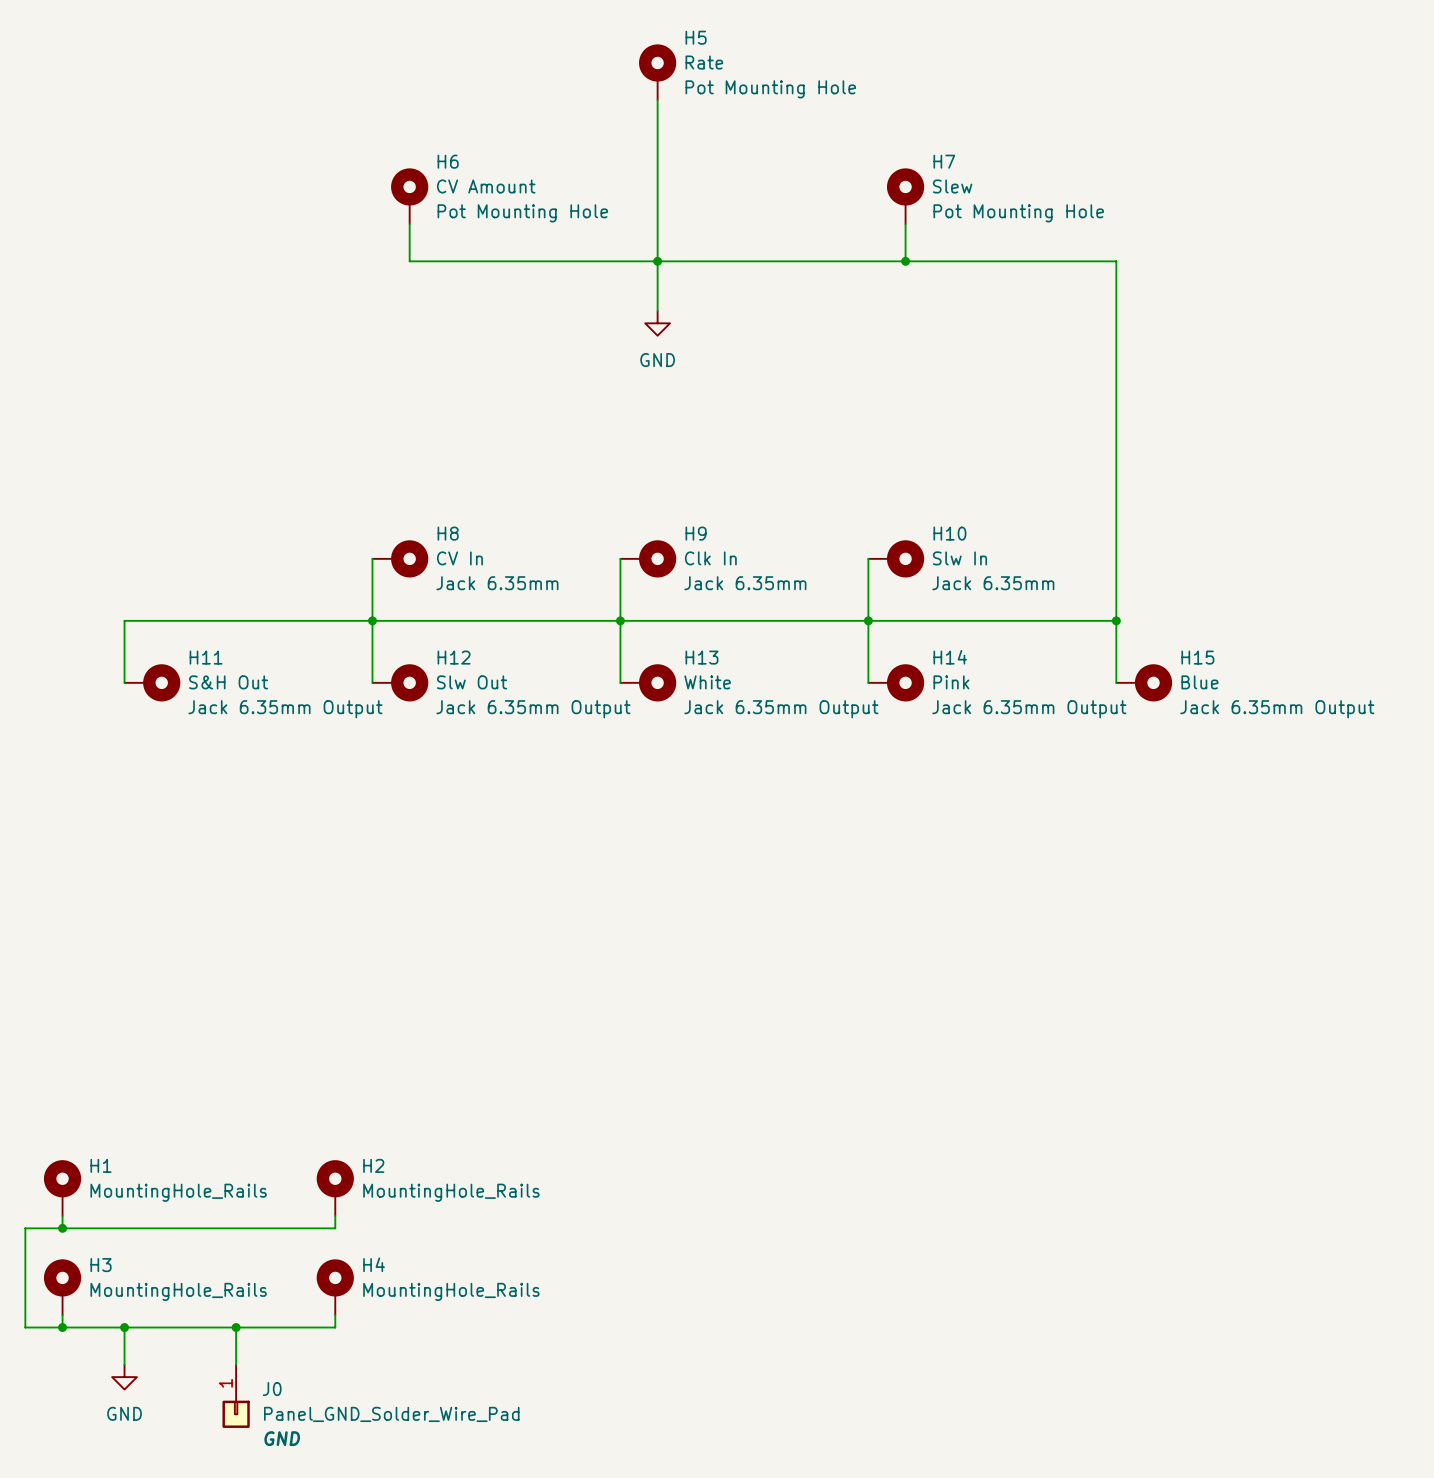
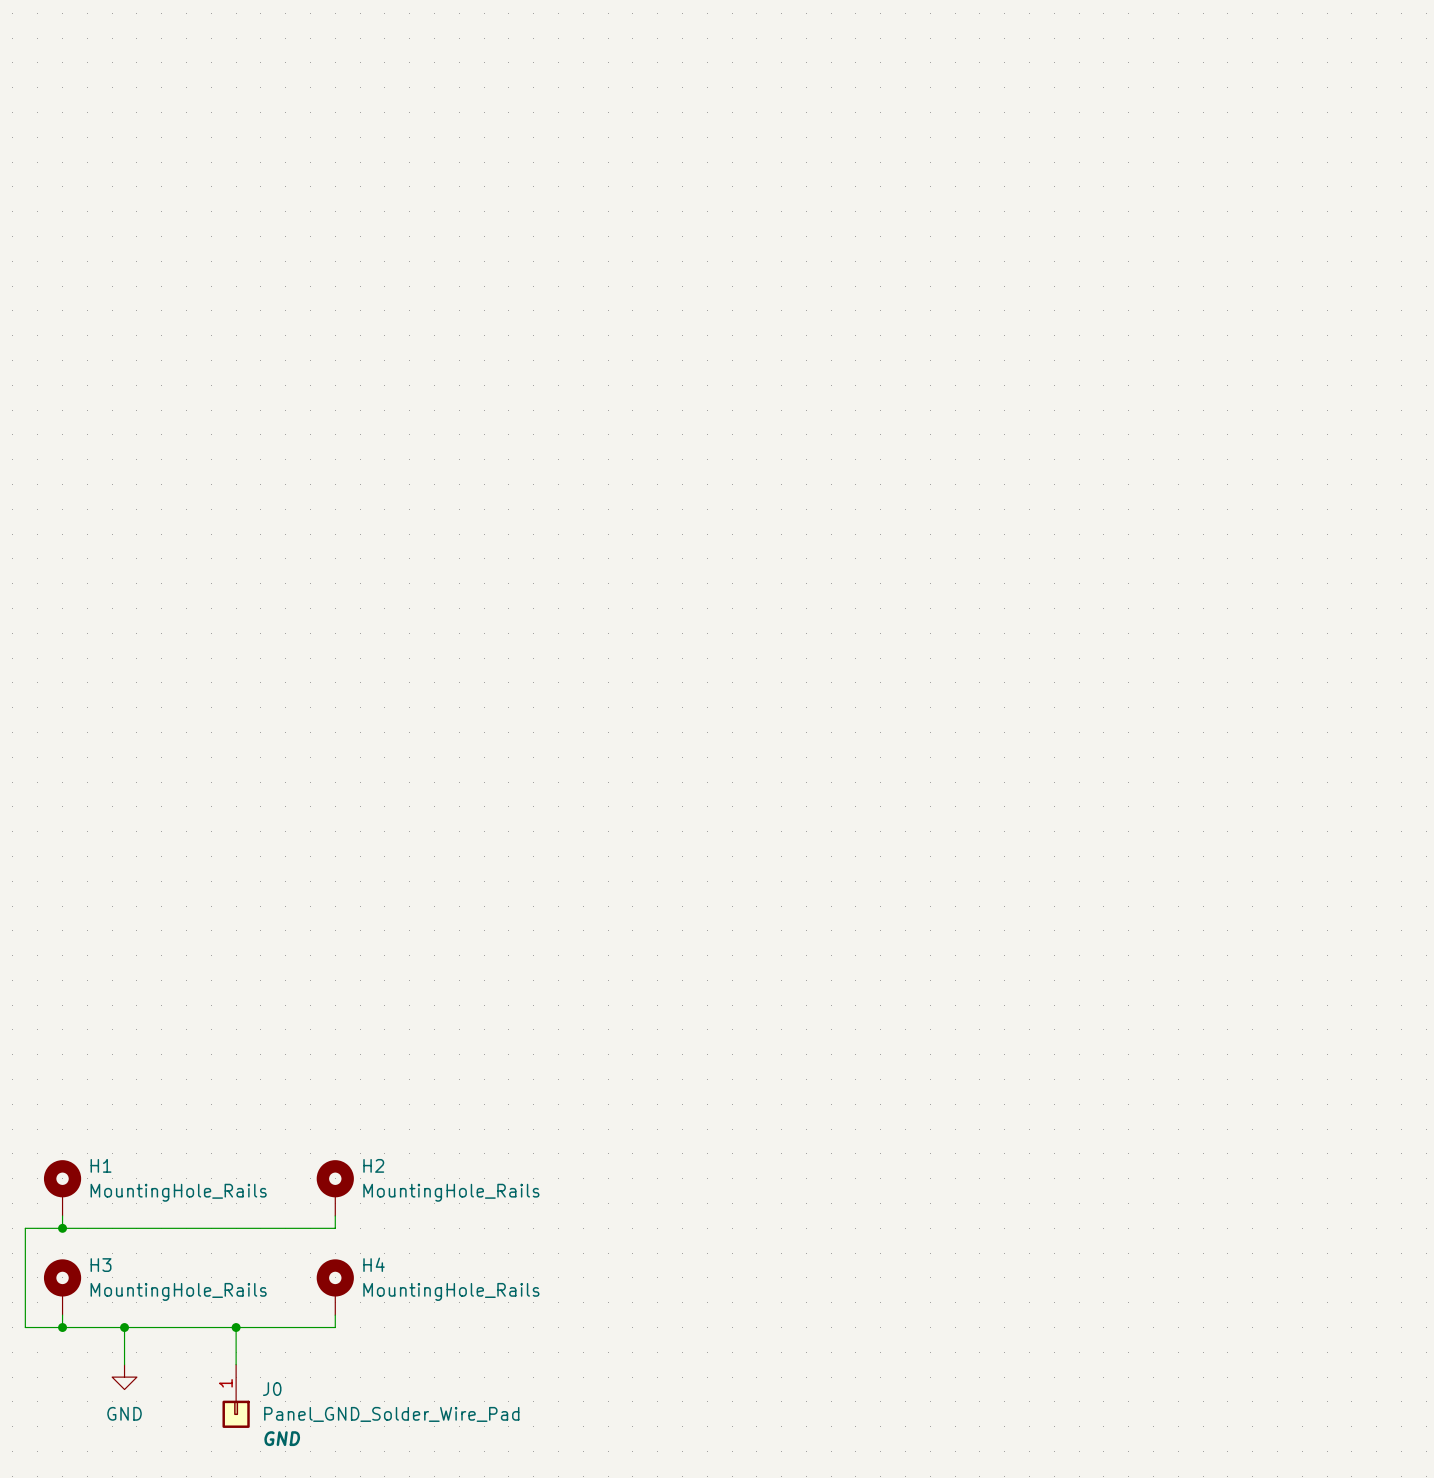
H5: Rate (657, 72) -> none
wire: (657, 100) (657, 310) -> none
H6: CV Amount (409, 196) -> none
H7: Slew (905, 196) -> none
wire: (409, 224) (409, 261) (1116, 261) (1116, 682) -> none
wire: (905, 224) (905, 261) -> none
junction: (657, 261) -> none
junction: (905, 261) -> none
power symbol: GND (657, 323) -> none
wire: (372, 558) (372, 682) -> none
H8: CV In (400, 558) -> none
wire: (620, 558) (620, 682) -> none
H9: Clk In (648, 558) -> none
wire: (868, 558) (868, 682) -> none
H10: Slw In (896, 558) -> none
junction: (372, 620) -> none
junction: (620, 620) -> none
junction: (868, 620) -> none
wire: (1116, 620) (124, 620) (124, 682) -> none
junction: (1116, 620) -> none
H11: S&H Out (152, 682) -> none
H12: Slw Out (400, 682) -> none
H13: White (648, 682) -> none
H14: Pink (896, 682) -> none
H15: Blue (1144, 682) -> none

